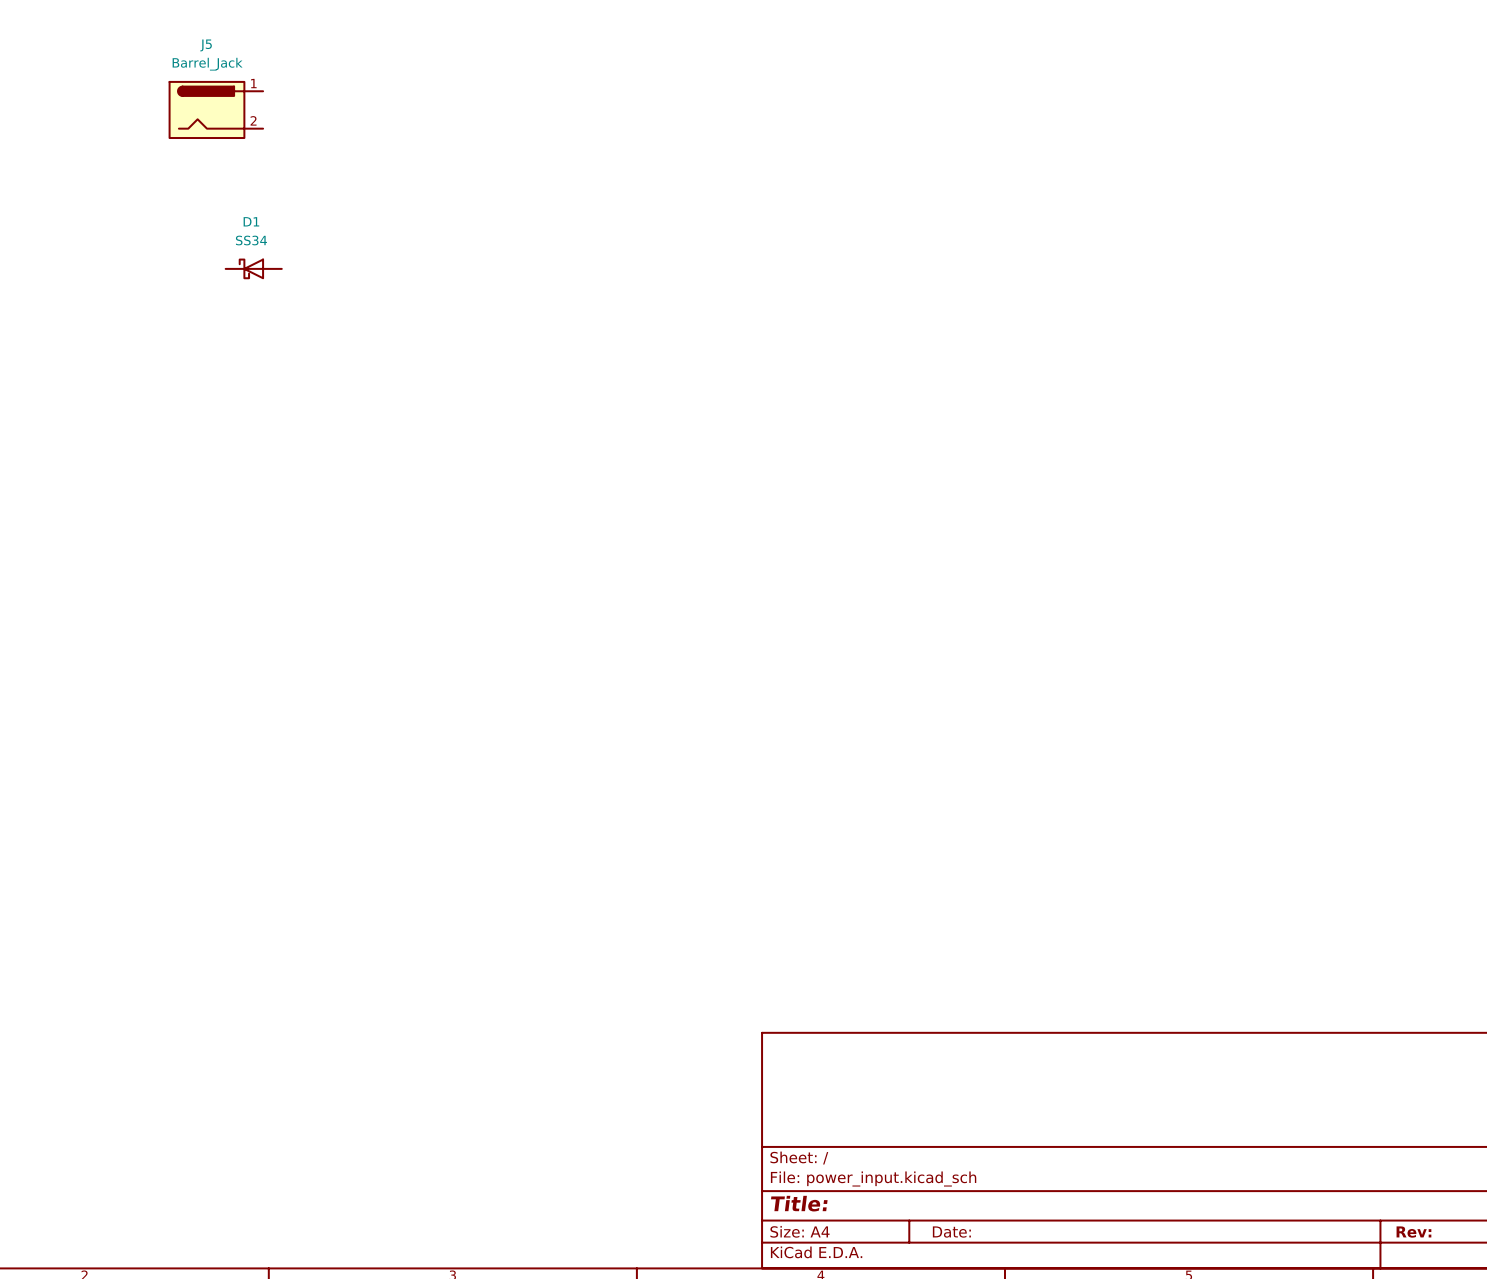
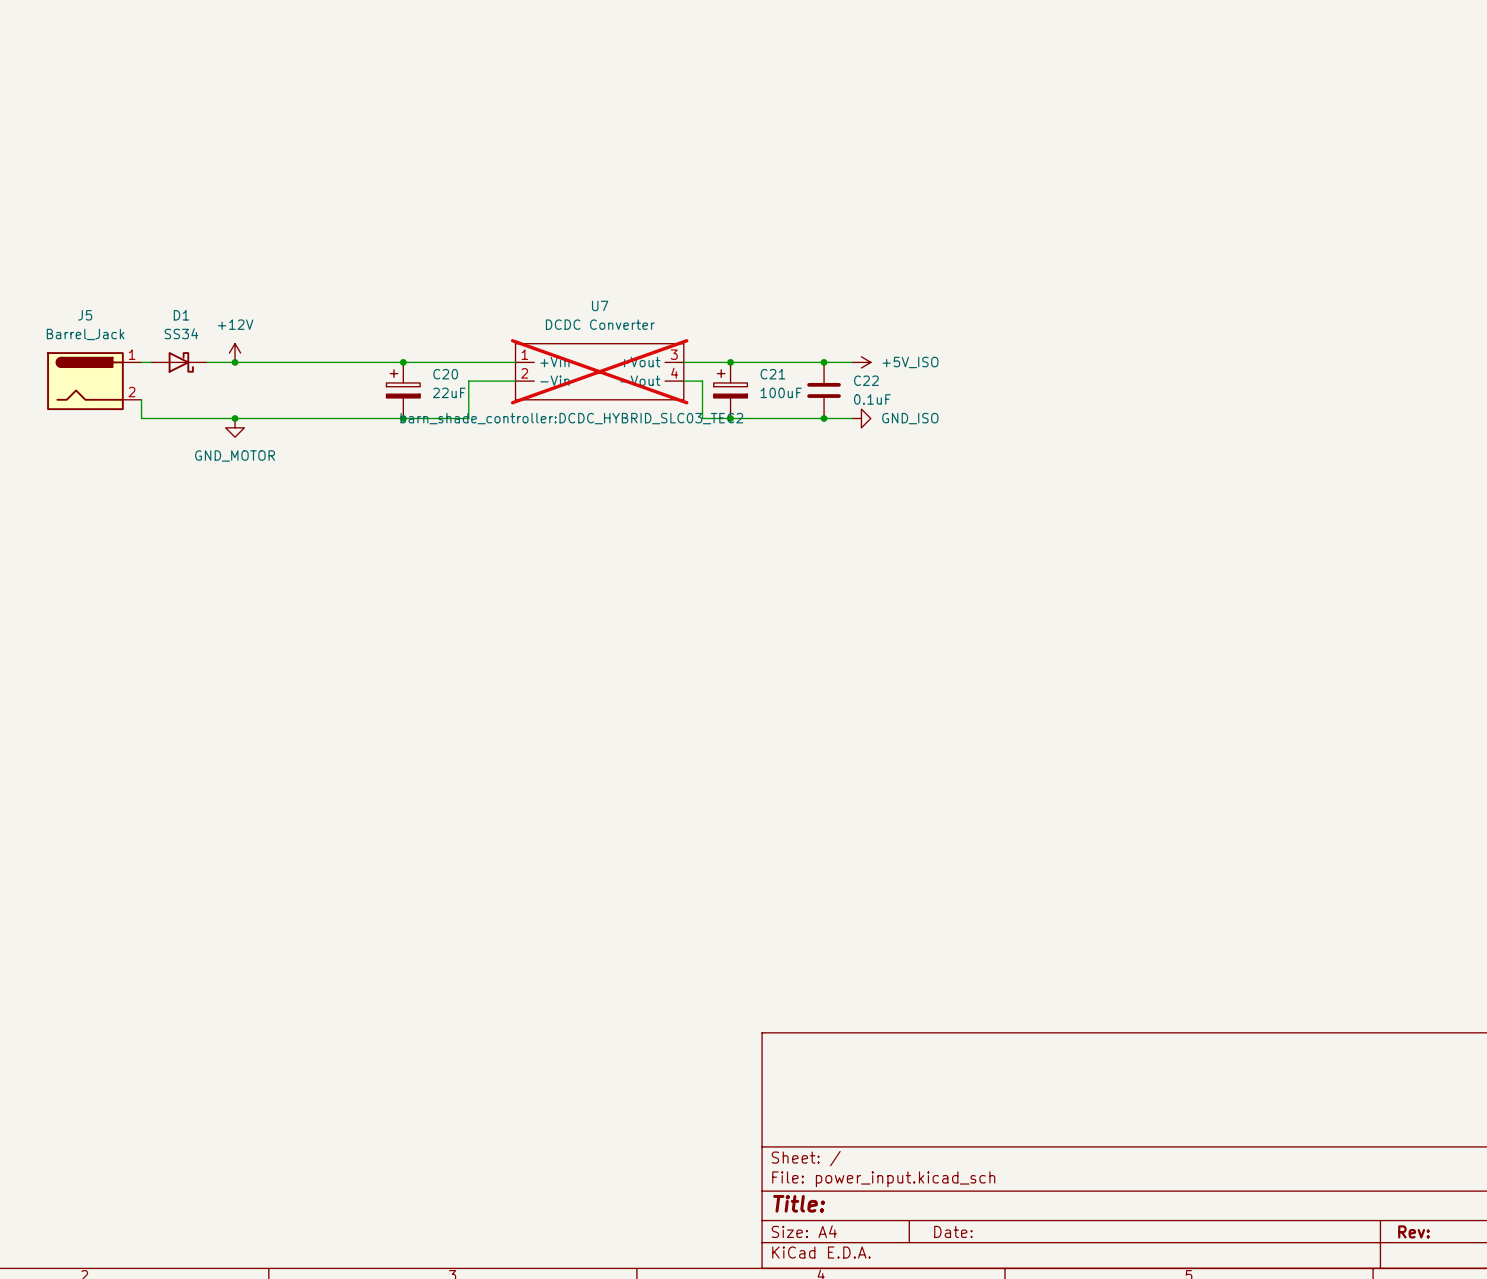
J5 position: (215, 109) -> (94, 381)
D1 rotation: 0° (251, 268) -> 180° (181, 362)
D1 position: (253, 268) -> (178, 362)
power symbol: none -> +12V (235, 353)
wire: none -> (141, 362) (150, 362)
wire: none -> (206, 362) (515, 362)
junction: none -> (235, 362)
junction: none -> (403, 362)
wire: none -> (683, 362) (852, 362)
junction: none -> (730, 362)
junction: none -> (824, 362)
power symbol: none -> +5V_ISO (861, 362)
U7: none -> DCDC Converter (599, 371)
wire: none -> (515, 381) (468, 381) (468, 418) (141, 418) (141, 399)
wire: none -> (683, 381) (702, 381) (702, 418) (852, 418)
C20: none -> 22uF (403, 390)
C21: none -> 100uF (730, 390)
C22: none -> 0.1uF (824, 390)
junction: none -> (235, 418)
junction: none -> (403, 418)
junction: none -> (730, 418)
junction: none -> (824, 418)
power symbol: none -> GND_ISO (861, 418)
power symbol: none -> GND_MOTOR (235, 427)

